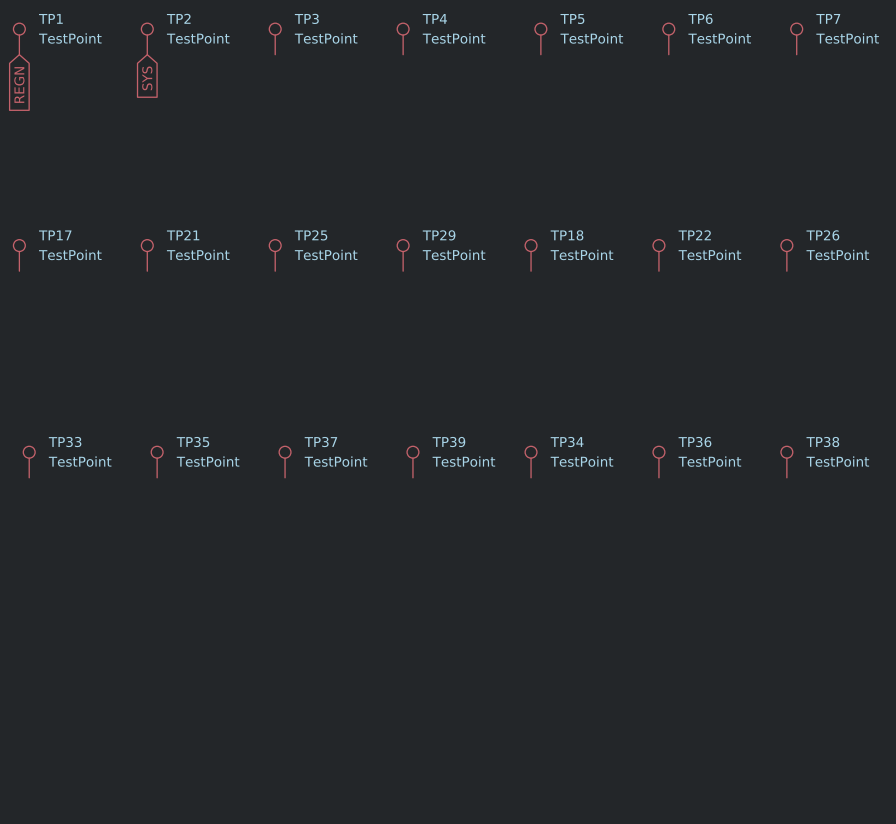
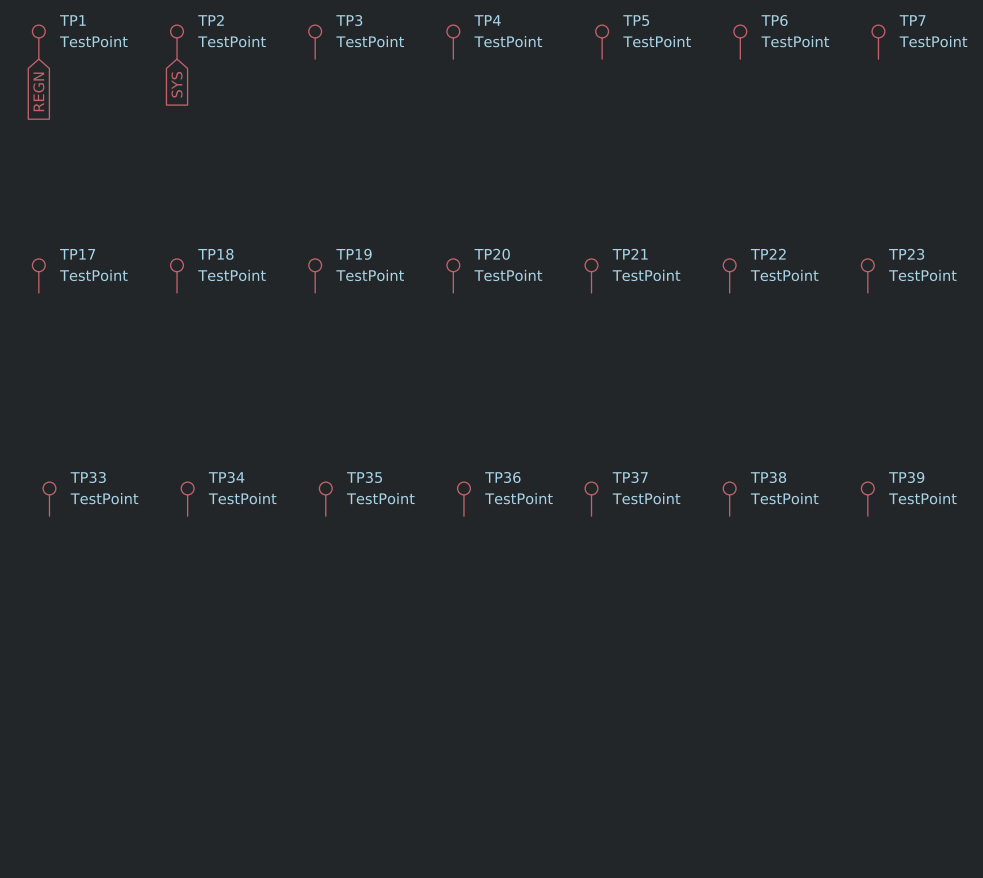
TP21 name: TP21 (183, 235) -> TP18 (215, 254)
TP25 name: TP25 (311, 235) -> TP19 (354, 254)
TP29 name: TP29 (439, 235) -> TP20 (492, 254)
TP18 name: TP18 (567, 235) -> TP21 (630, 254)
TP26 name: TP26 (822, 235) -> TP23 (906, 254)
TP35 name: TP35 (192, 442) -> TP34 (226, 477)
TP37 name: TP37 (320, 442) -> TP35 (364, 477)
TP39 name: TP39 (448, 442) -> TP36 (502, 477)
TP34 name: TP34 (567, 442) -> TP37 (630, 477)
TP36 name: TP36 (694, 442) -> TP38 (768, 477)
TP38 name: TP38 (822, 442) -> TP39 (906, 477)

